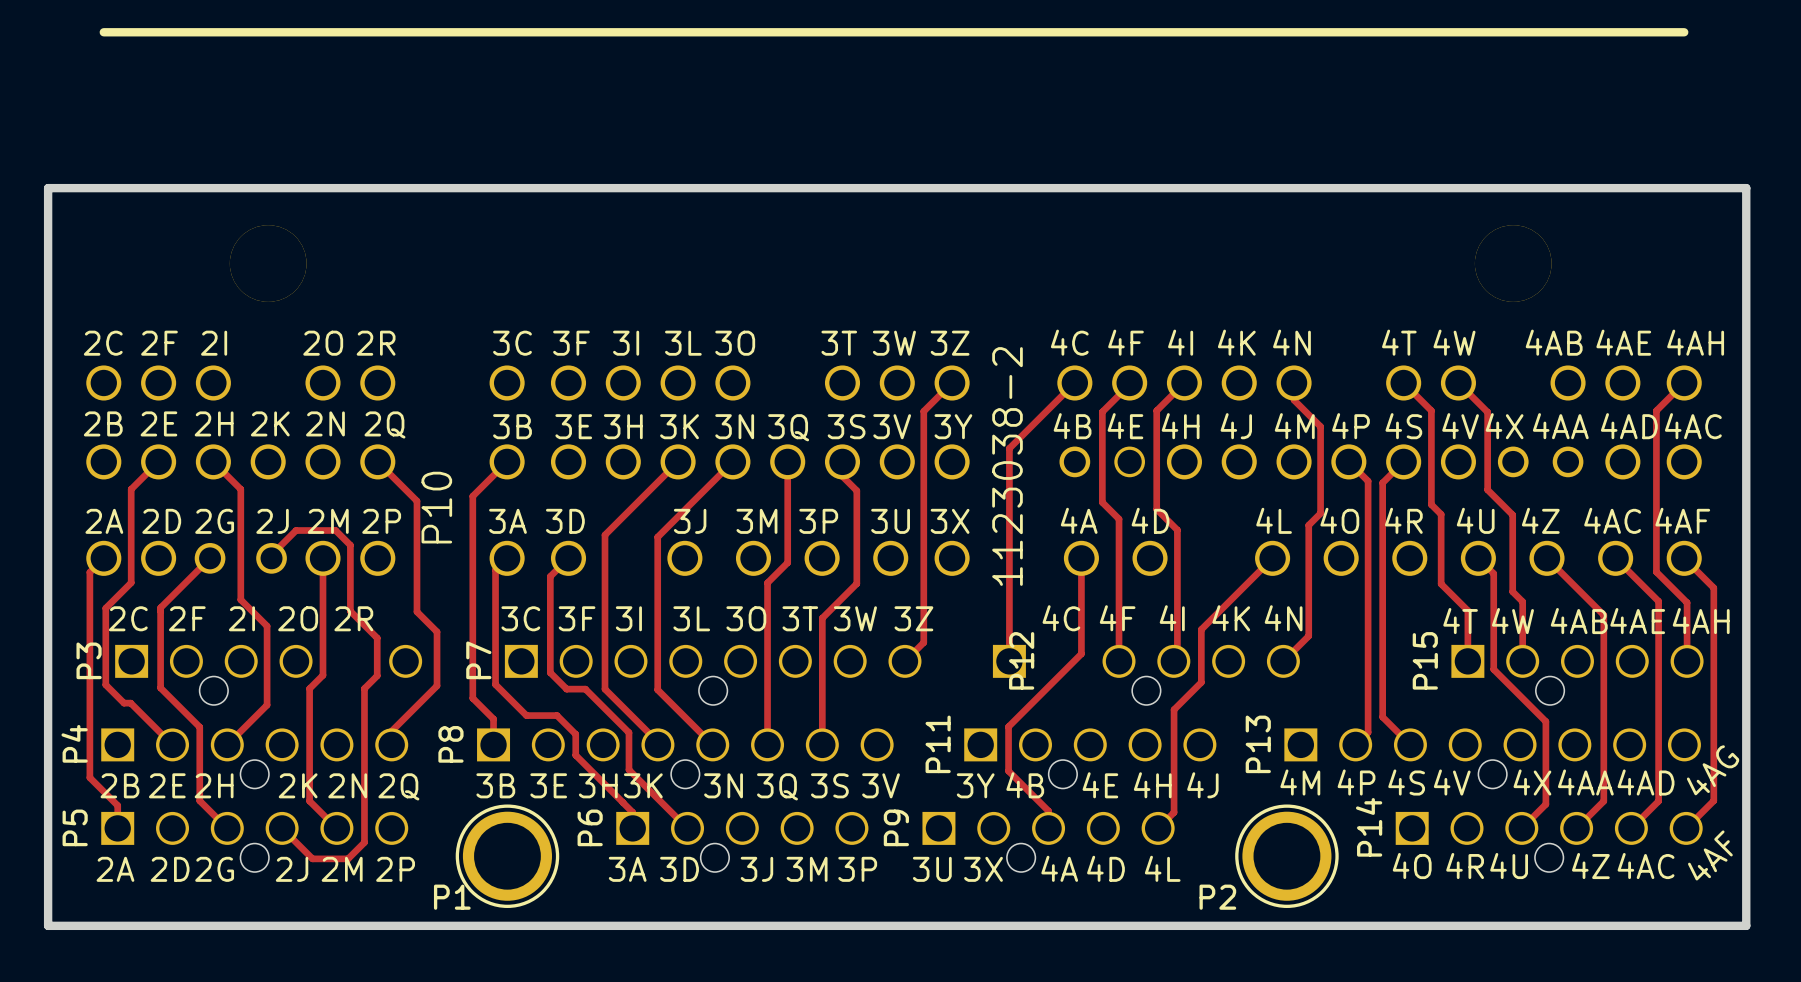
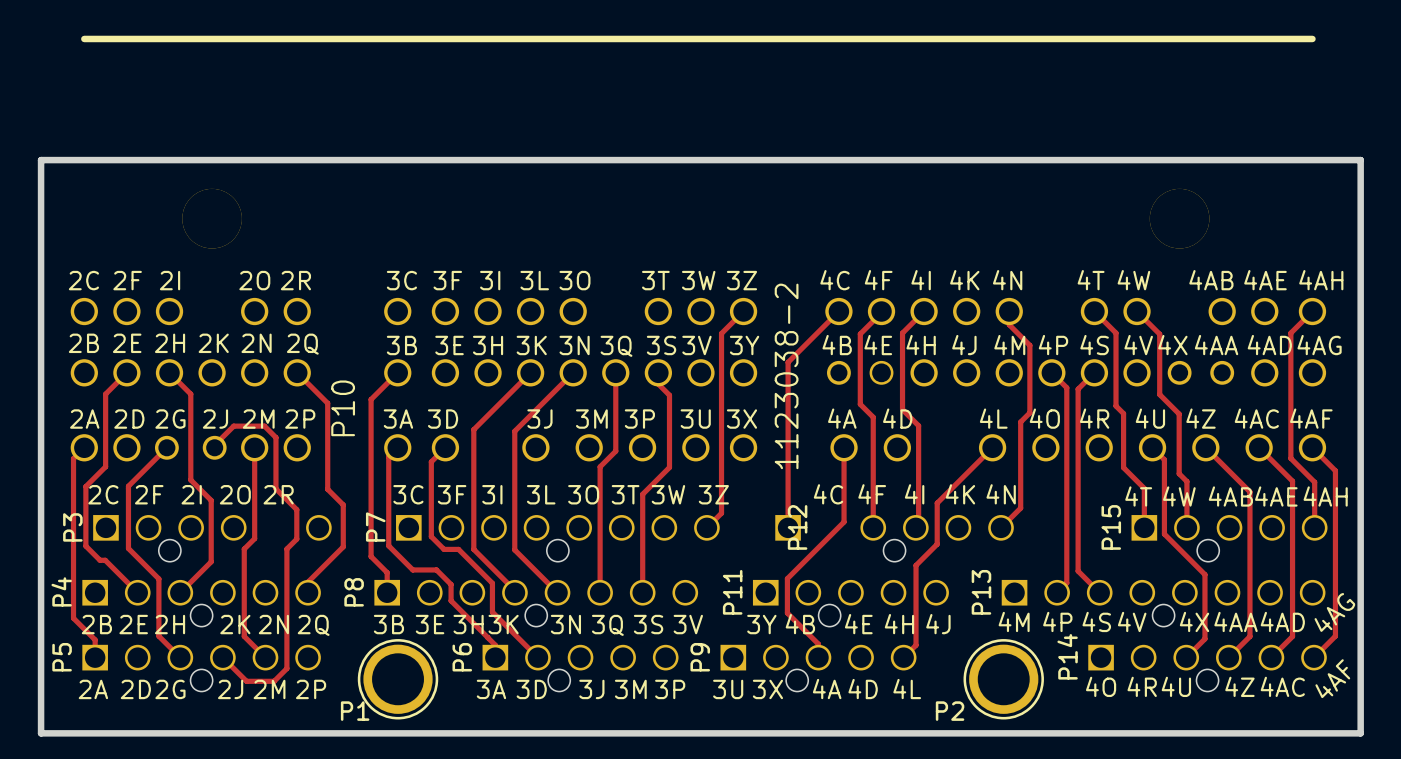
text: 4AC (1693, 426) -> 4AG (1319, 345)

